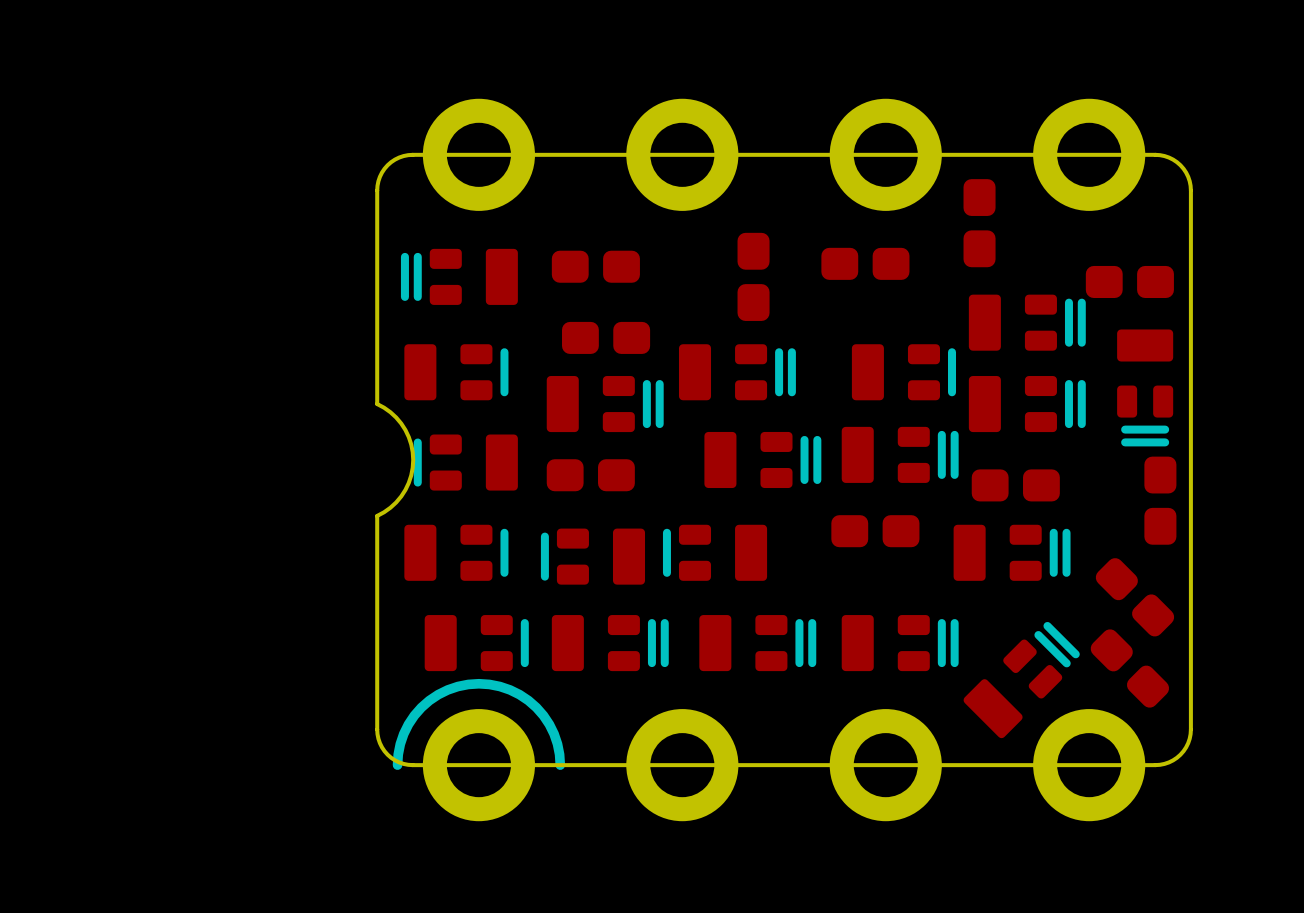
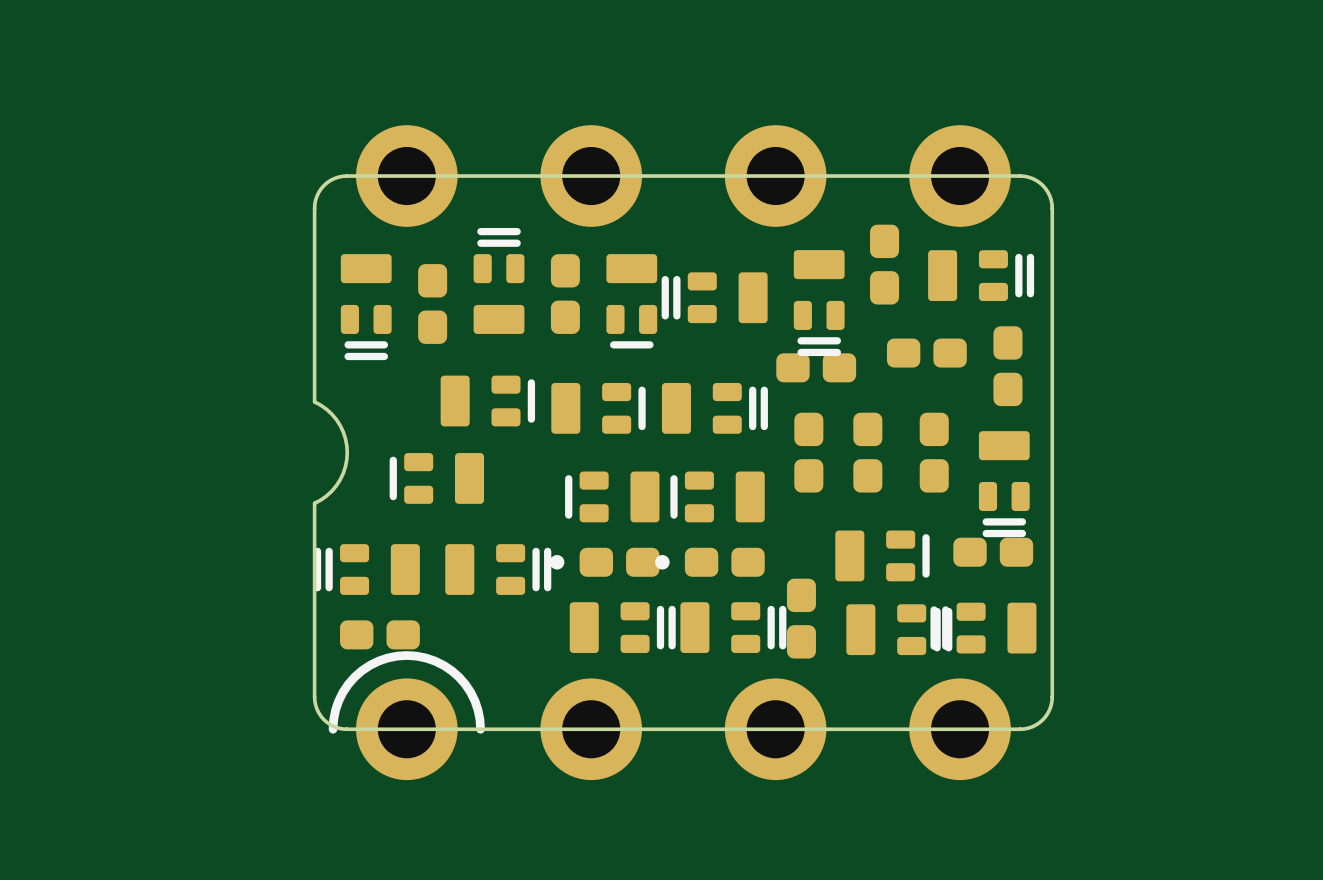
part position: (979, 223) -> (884, 264)
part footprint: [737, 232, 770, 321] -> [606, 254, 658, 349]
part footprint: [551, 250, 640, 283] -> [473, 227, 525, 334]
part: (865, 263) -> none
part footprint: [1085, 265, 1174, 299] -> [928, 250, 1035, 302]
part rotation: 0° (459, 276) -> 90° counterclockwise (366, 307)
part: none -> (565, 294)
part: none -> (714, 297)
part: none -> (819, 303)
part: none -> (432, 304)
part: (1027, 322) -> none
part footprint: [1117, 329, 1174, 447] -> [993, 326, 1023, 407]
part: (606, 337) -> none
part footprint: [851, 344, 957, 401] -> [776, 353, 857, 383]
part: none -> (926, 353)
part: (456, 372) -> none
part: (737, 372) -> none
part: none -> (487, 401)
part: (605, 404) -> none
part: (1027, 404) -> none
part: none -> (598, 408)
part: none -> (714, 408)
part footprint: [841, 426, 959, 483] -> [794, 412, 824, 493]
part footprint: [1144, 456, 1177, 545] -> [978, 431, 1030, 538]
part: (762, 459) -> none
part: none -> (867, 452)
part: none -> (934, 452)
part: (465, 462) -> none
part: (590, 475) -> none
part: (1015, 485) -> none
part: none -> (436, 478)
part: none -> (717, 496)
part footprint: [953, 524, 1071, 581] -> [835, 530, 930, 582]
part: (875, 531) -> none
part: (456, 552) -> none
part position: (715, 552) -> (612, 496)
part: (592, 556) -> none
part: none -> (604, 562)
part: none -> (709, 562)
part: none -> (366, 569)
part: none -> (498, 569)
part rotation: 0° (1134, 597) -> 45° counterclockwise (993, 552)
part footprint: [424, 615, 529, 672] -> [340, 620, 420, 650]
part footprint: [841, 615, 959, 672] -> [786, 578, 816, 659]
part footprint: [1090, 629, 1170, 708] -> [930, 602, 1037, 654]
part: (610, 643) -> none
part: (757, 643) -> none
part: none -> (622, 627)
part: none -> (733, 627)
part rotation: 0° (1021, 680) -> 45° clockwise (899, 629)

